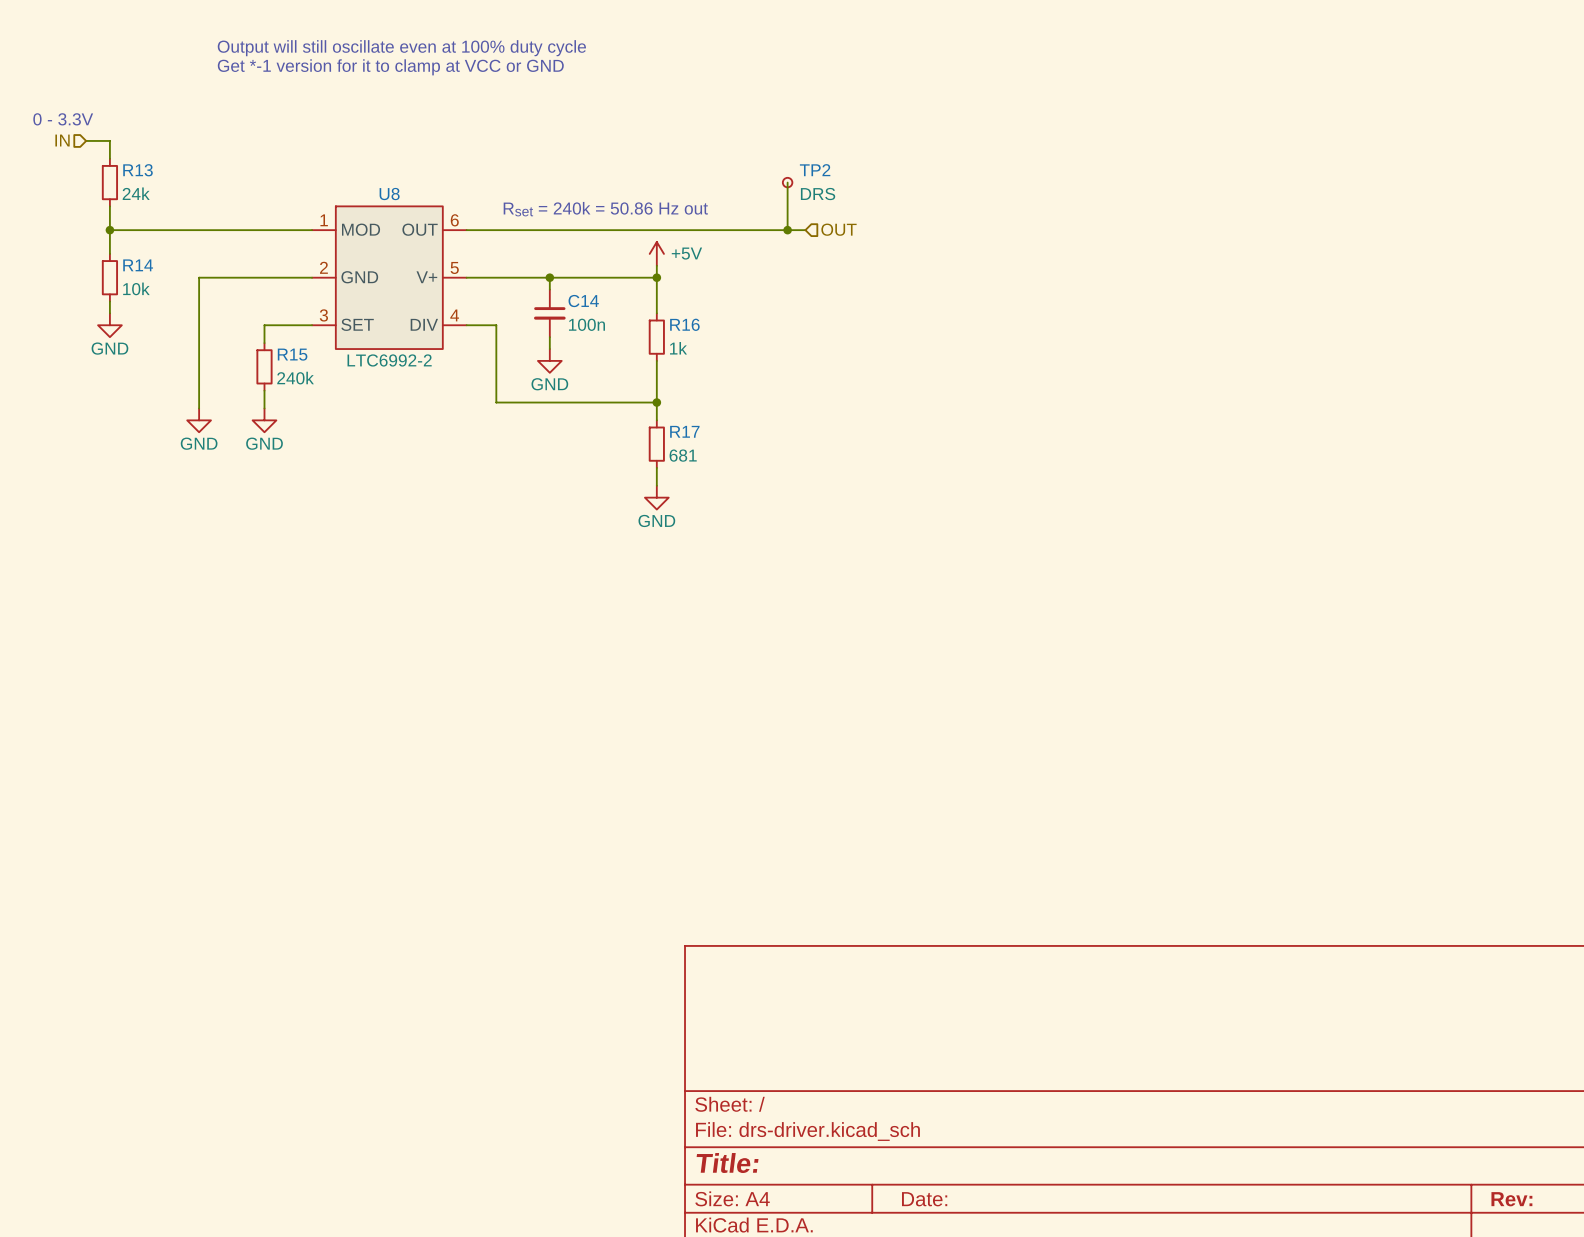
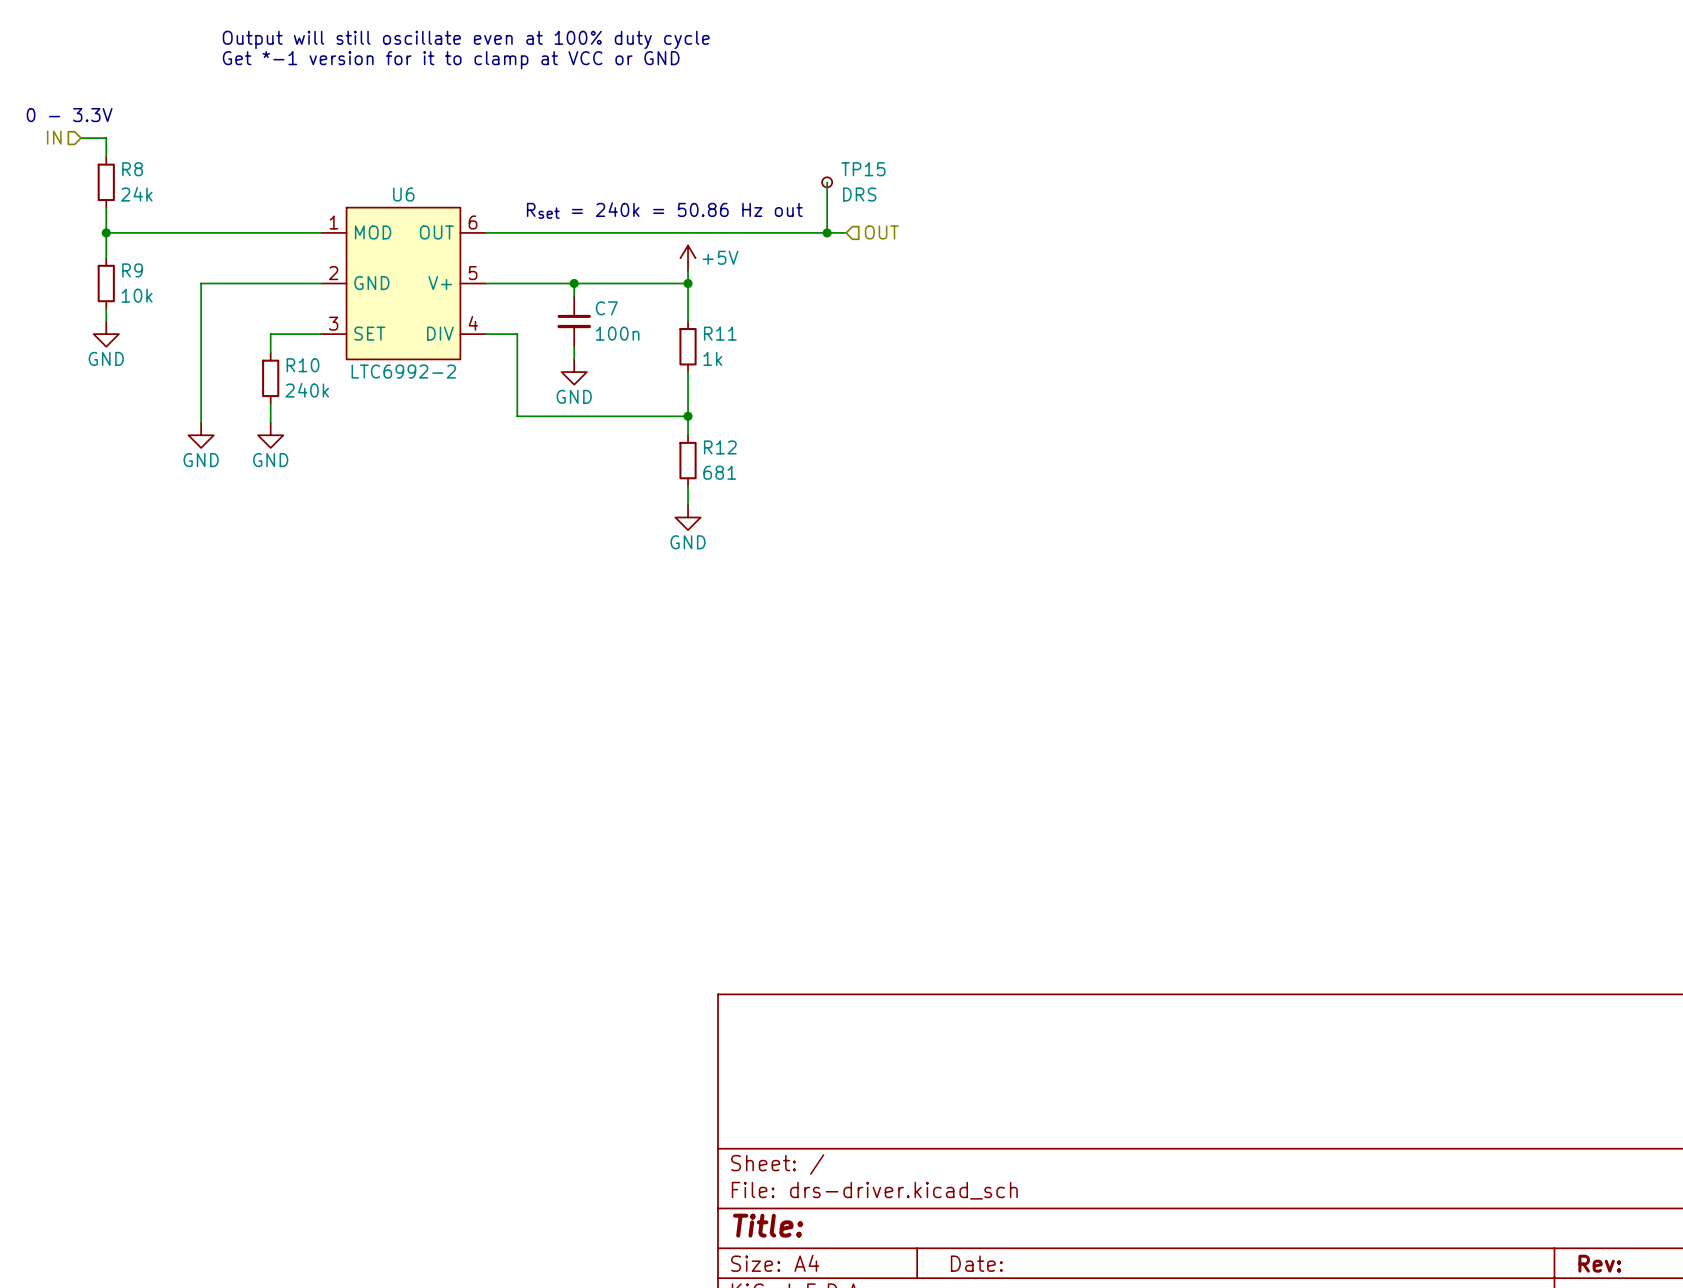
R13 name: R13 (138, 170) -> R8 (132, 169)
TP2 name: TP2 (815, 170) -> TP15 (863, 169)
U8 name: U8 (389, 194) -> U6 (403, 194)
R14 name: R14 (138, 265) -> R9 (132, 270)
C14 name: C14 (583, 301) -> C7 (606, 308)
R16 name: R16 (684, 324) -> R11 (720, 333)
R15 name: R15 (292, 354) -> R10 (302, 365)
R17 name: R17 (684, 431) -> R12 (720, 447)

